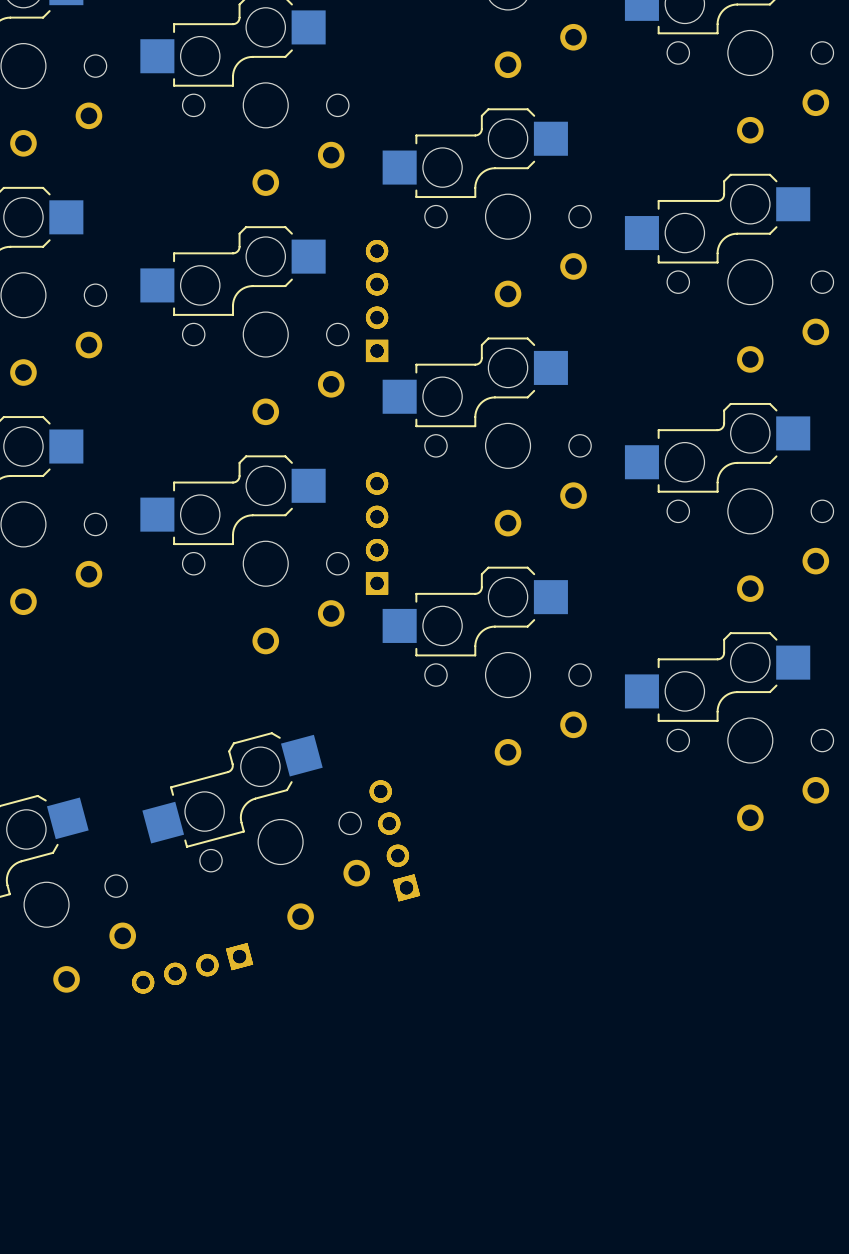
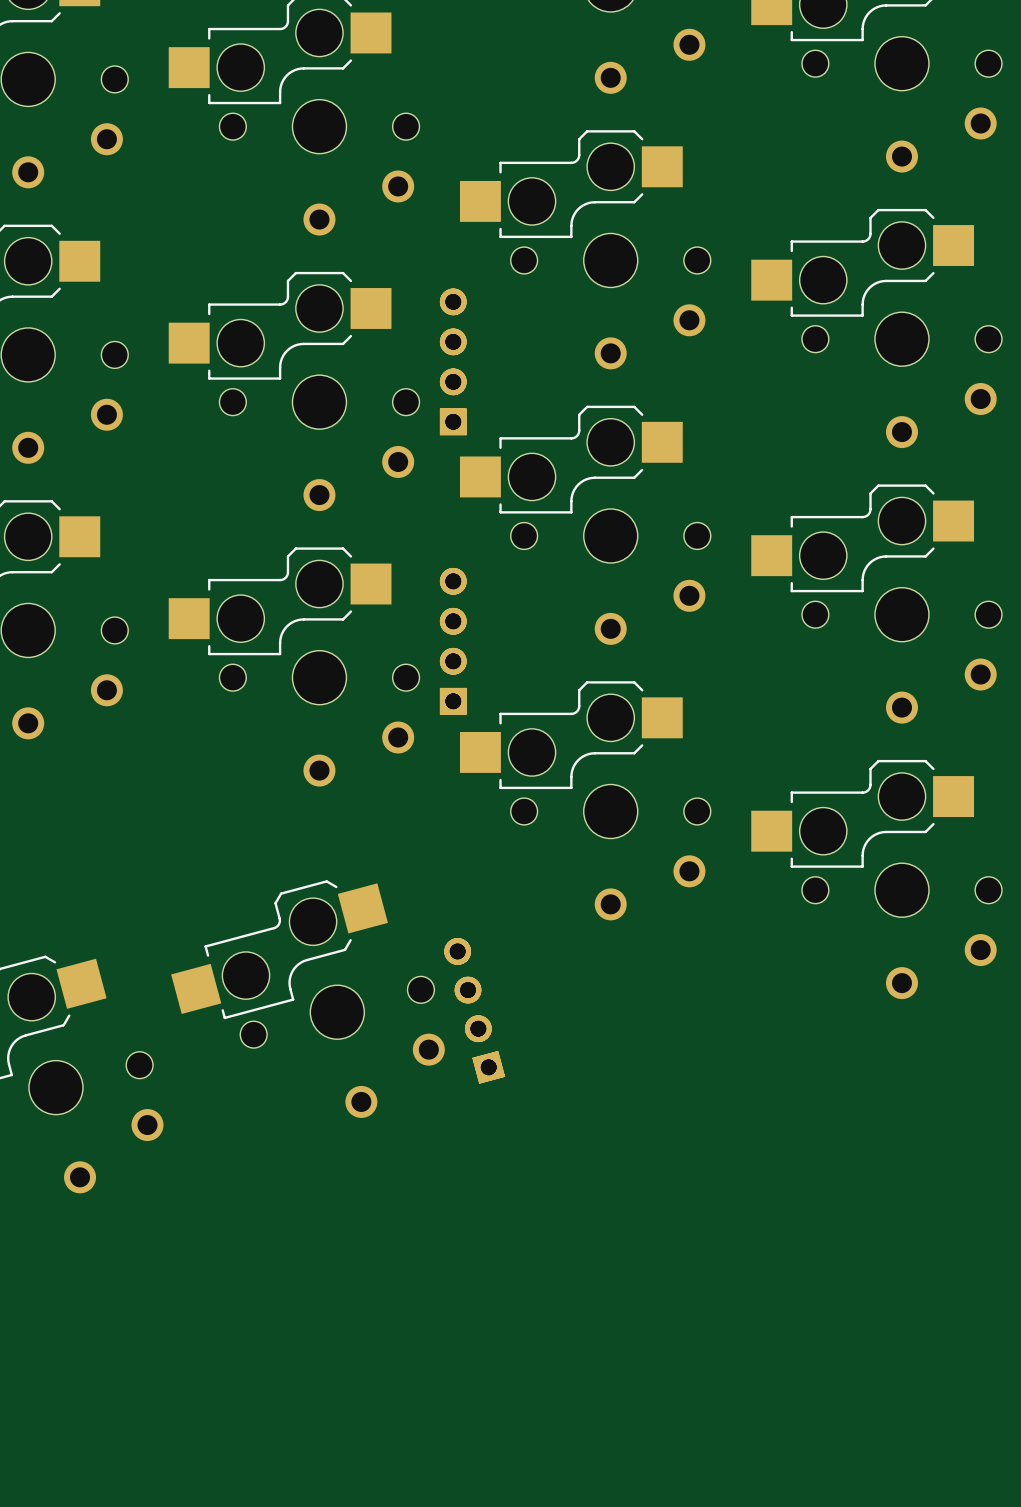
part: (192, 968) -> none

